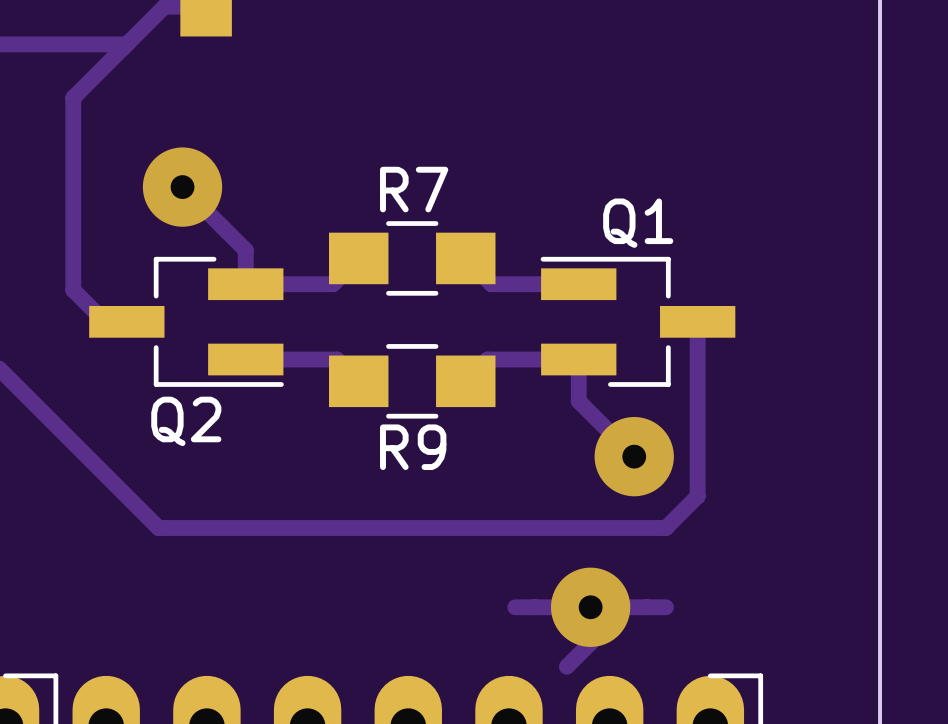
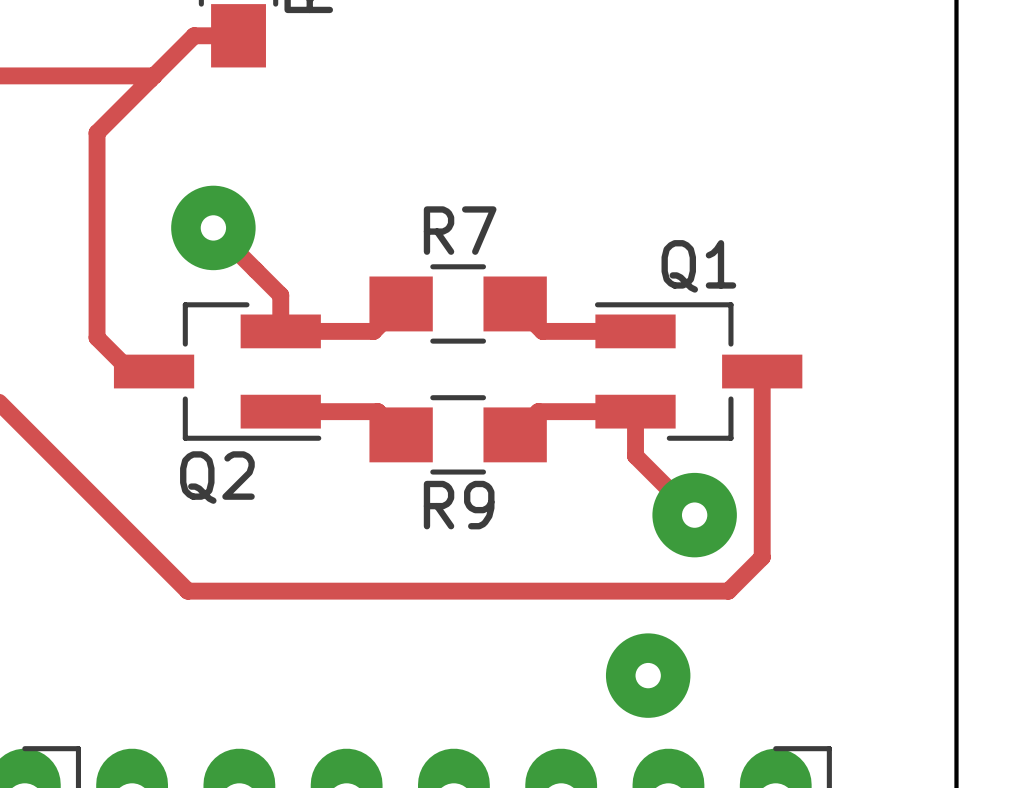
track: (515, 607) (665, 607) -> none
track: (590, 607) (590, 642) (566, 666) -> none

